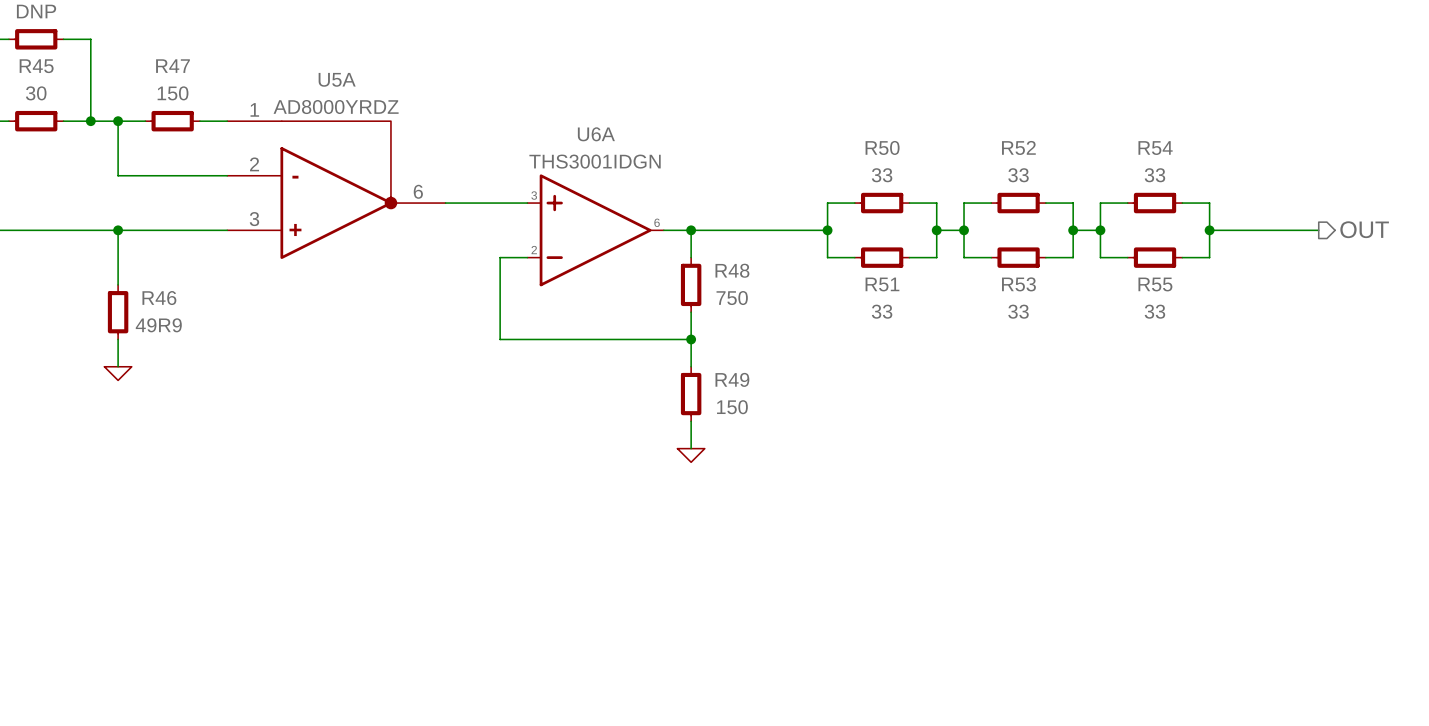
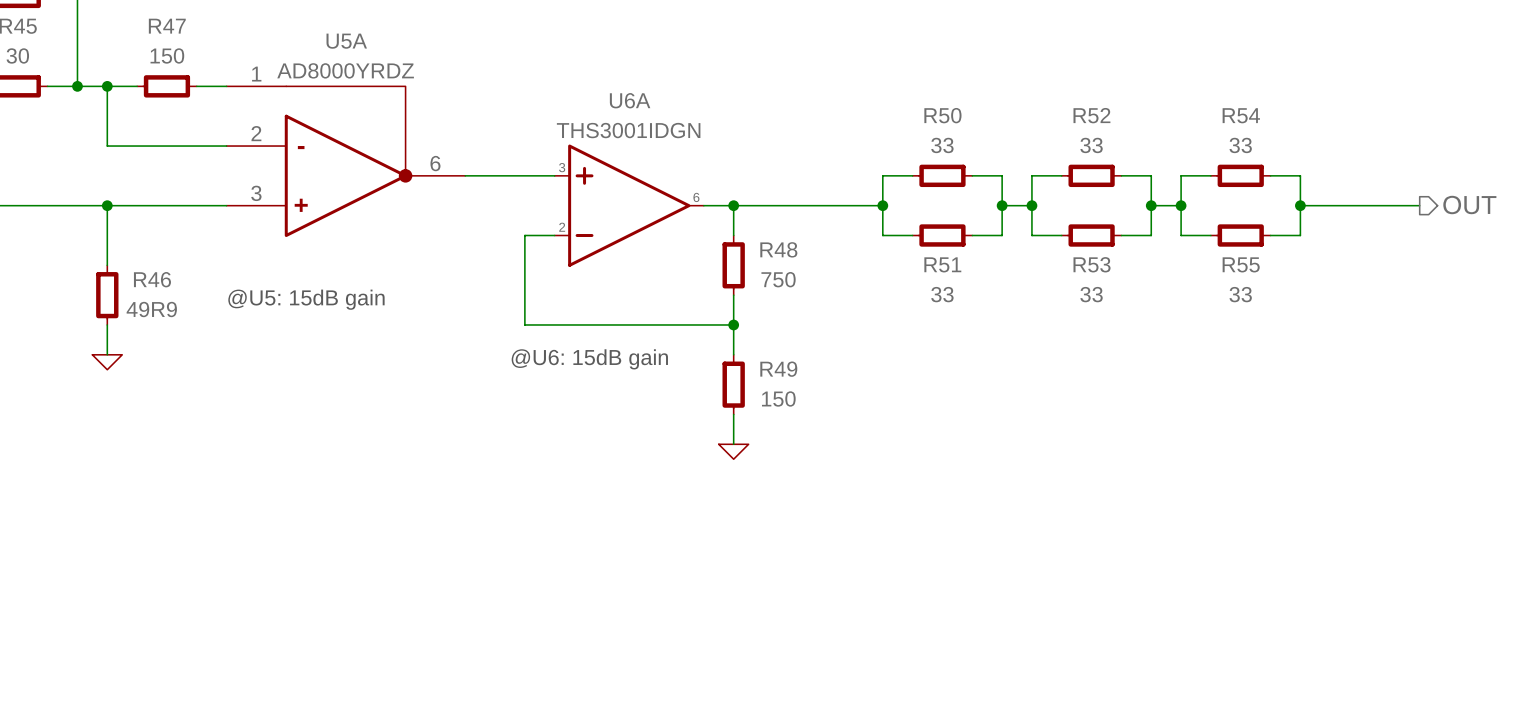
text: none -> @U5: 15dB gain (306, 299)
text: none -> @U6: 15dB gain (589, 359)

